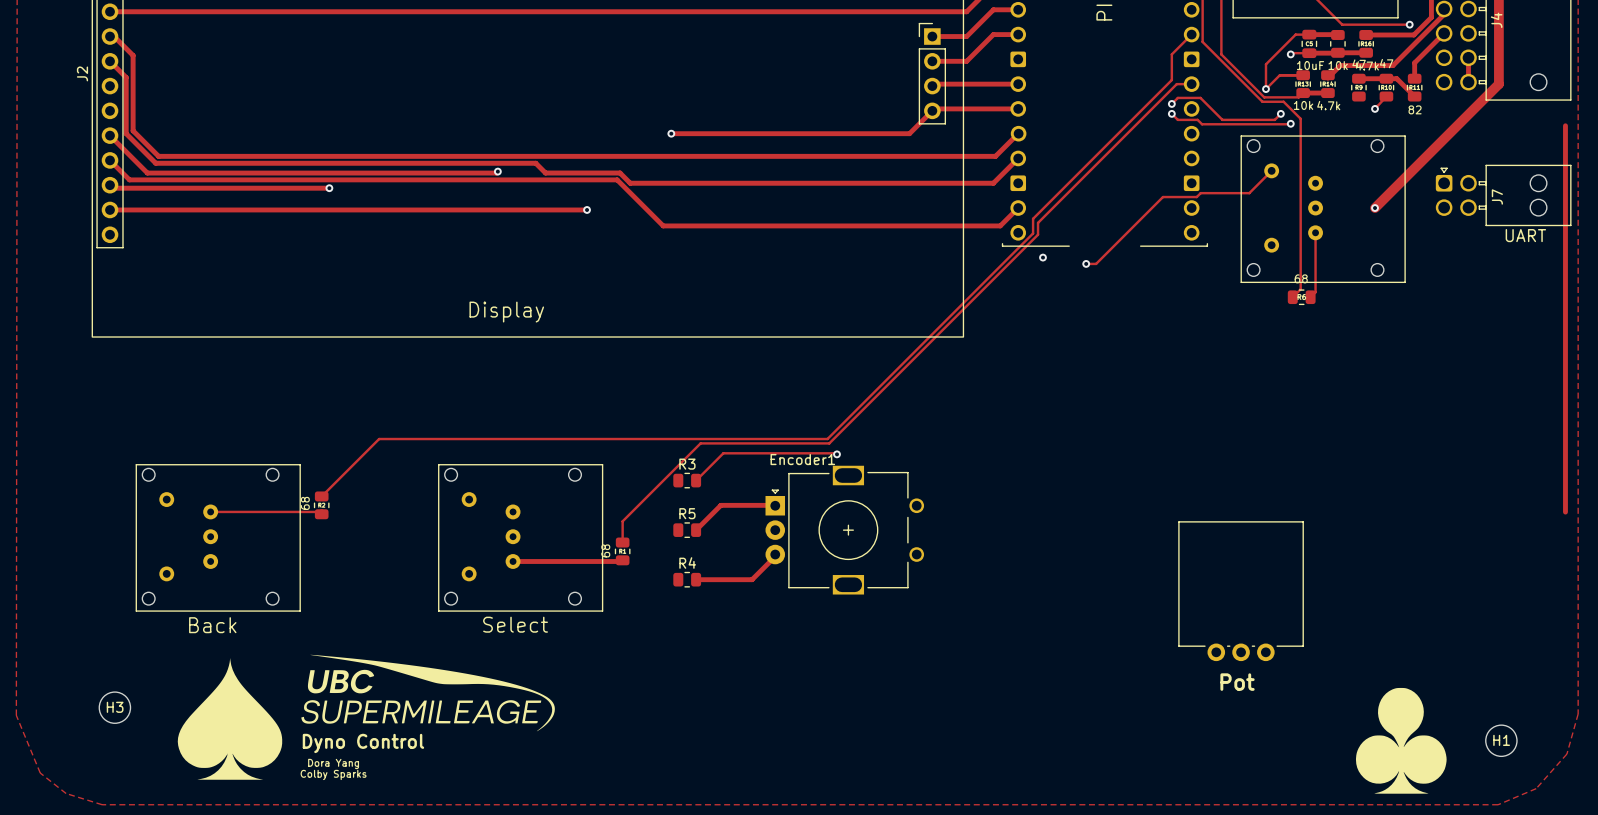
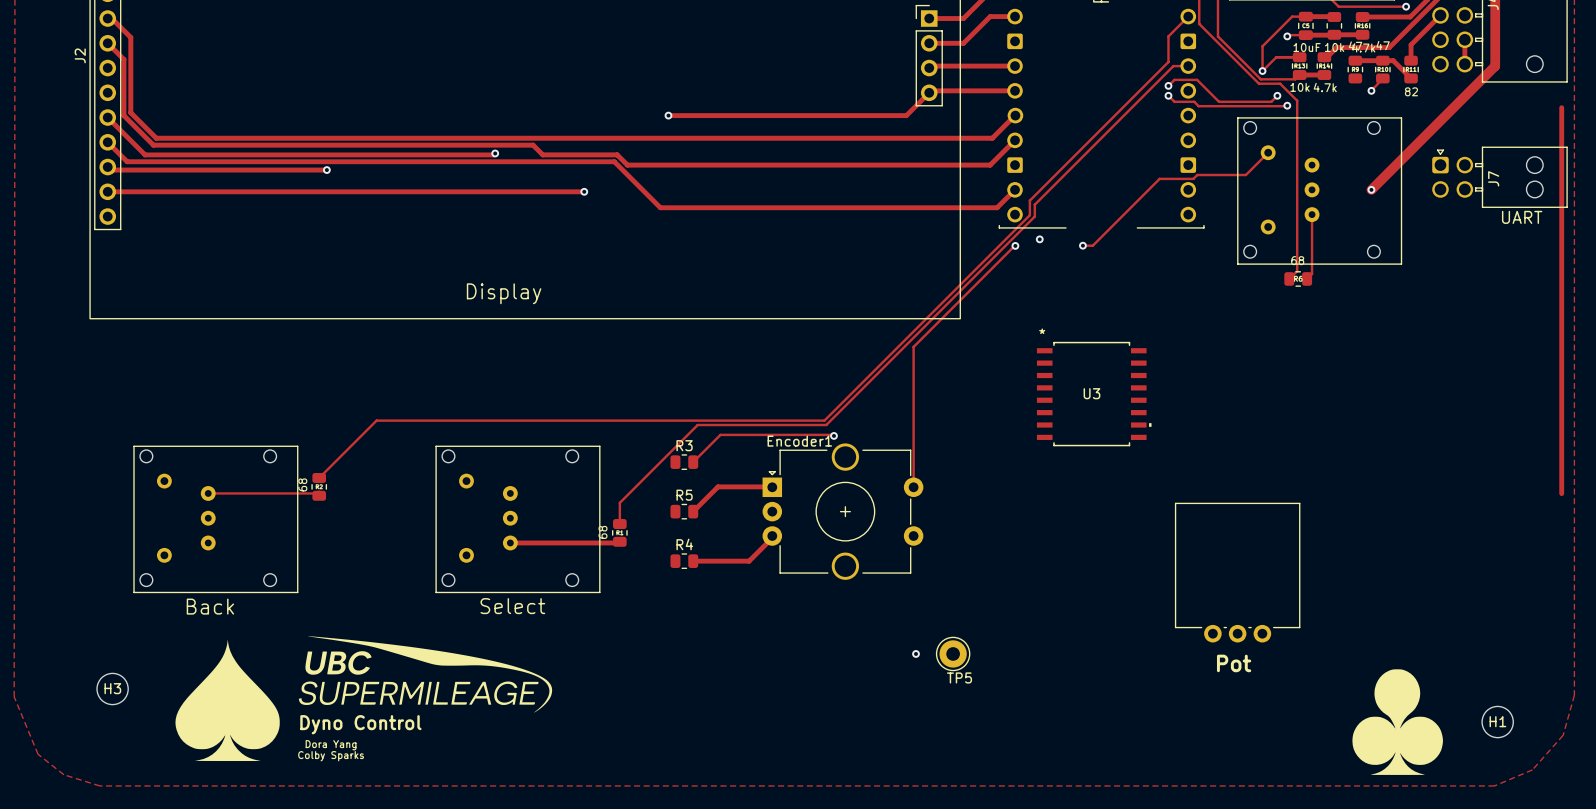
track: none -> (1015, 245) (913, 346) (913, 487)
via: none -> (1015, 245)
U3: none -> (1094, 394)
Encoder1 footprint: [765, 465, 925, 595] -> [762, 443, 924, 580]
via: none -> (916, 653)
TP5: none -> (953, 653)

